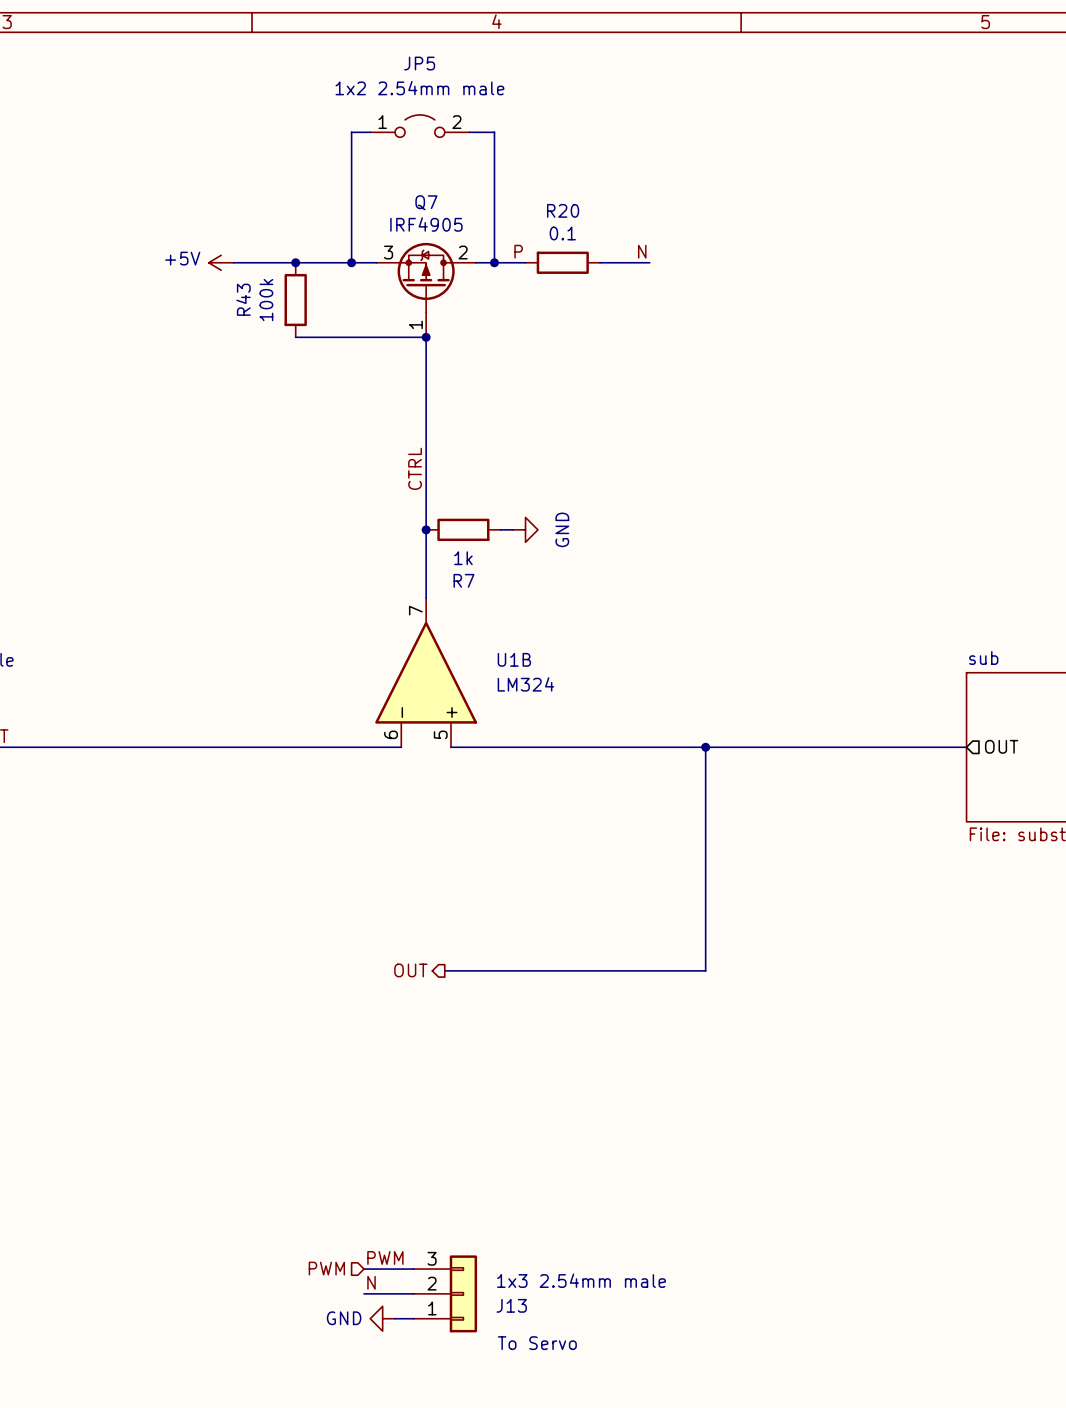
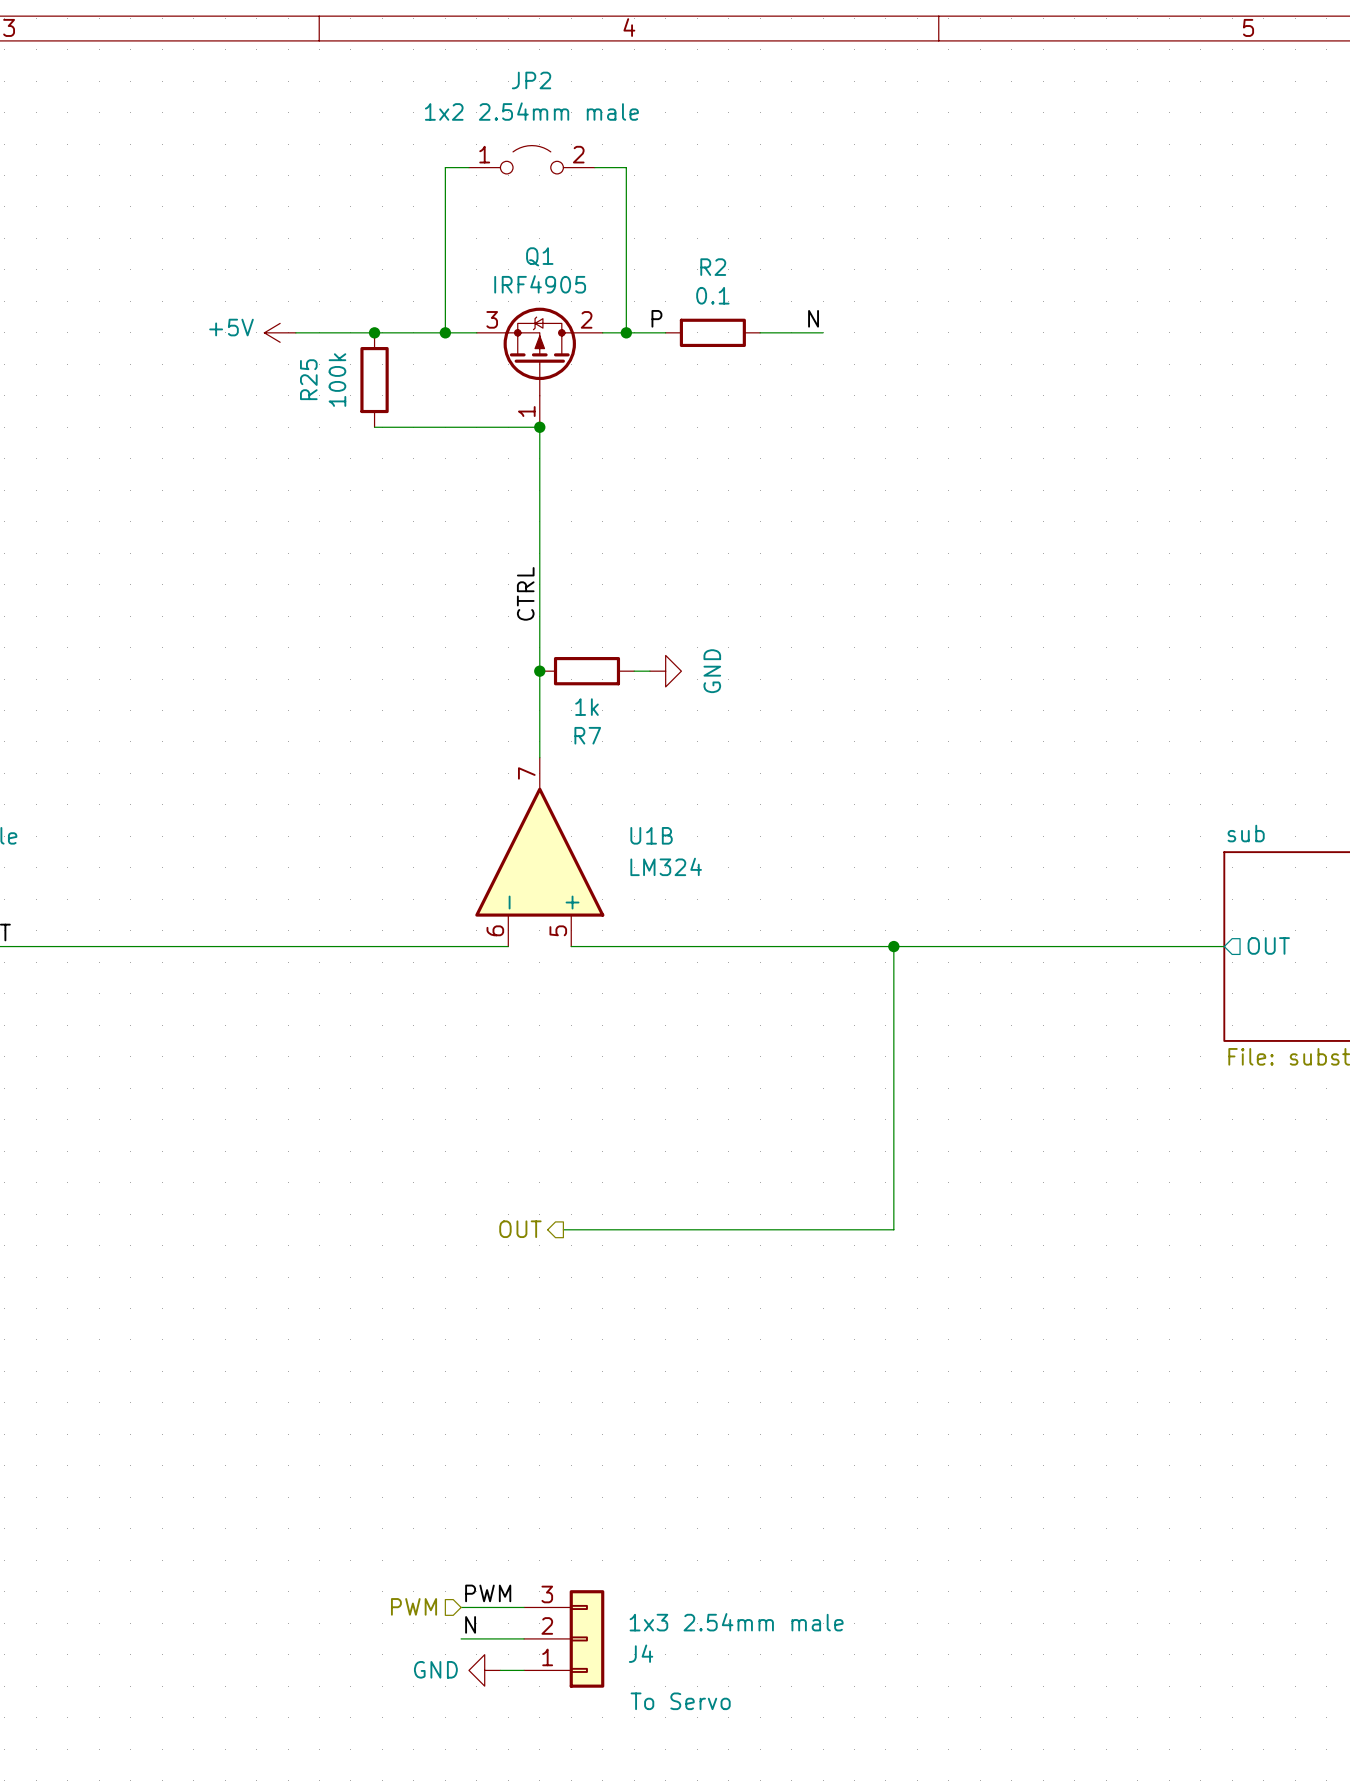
JP5 name: JP5 (419, 63) -> JP2 (531, 80)
Q7 name: Q7 (426, 202) -> Q1 (539, 256)
R20 name: R20 (563, 210) -> R2 (713, 267)
R43 name: R43 (243, 299) -> R25 (308, 379)
J13 name: J13 (511, 1305) -> J4 (641, 1653)

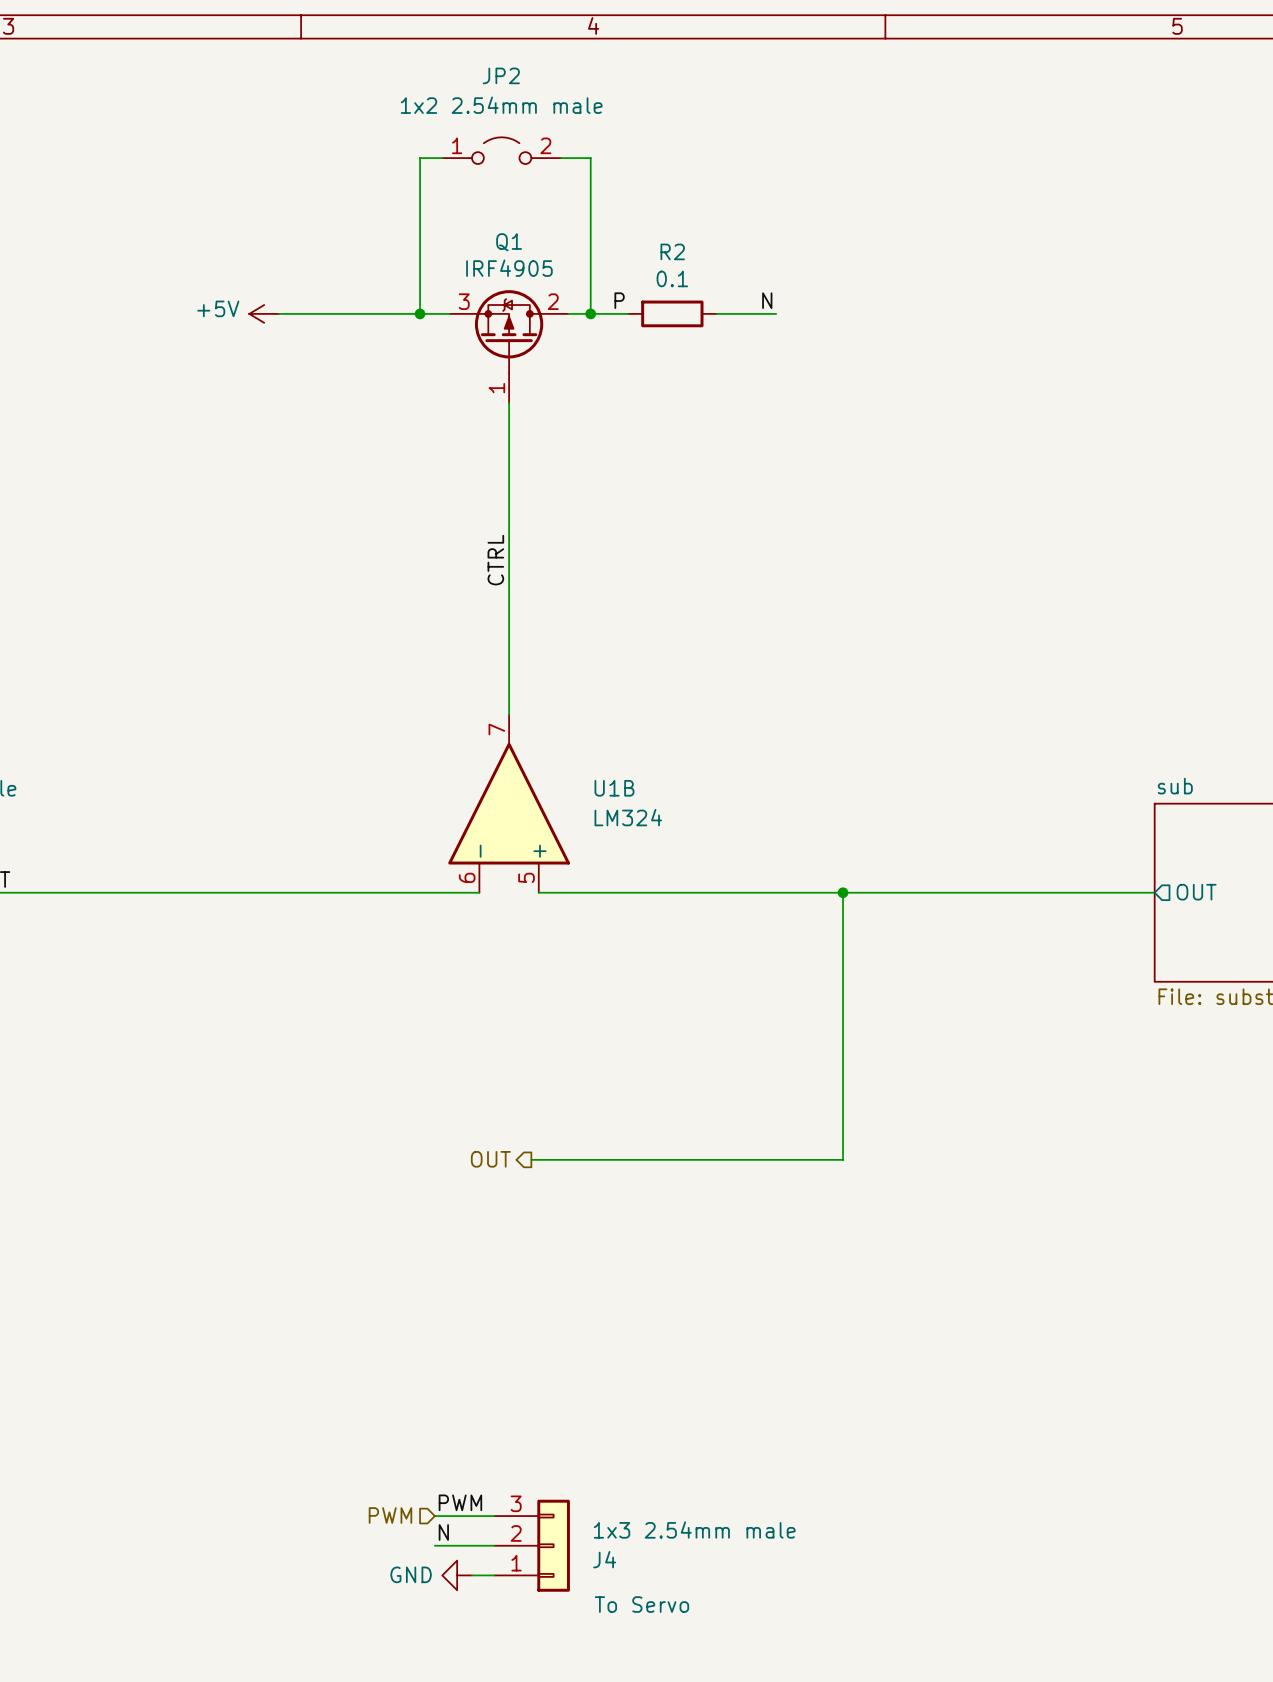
junction: (374, 332) -> none
R25: 100k (374, 380) -> none
wire: (374, 427) (539, 427) -> none
junction: (539, 427) -> none
junction: (539, 671) -> none
R7: 1k (586, 671) -> none
wire: (634, 671) (649, 671) -> none
power symbol: GND (665, 671) -> none

